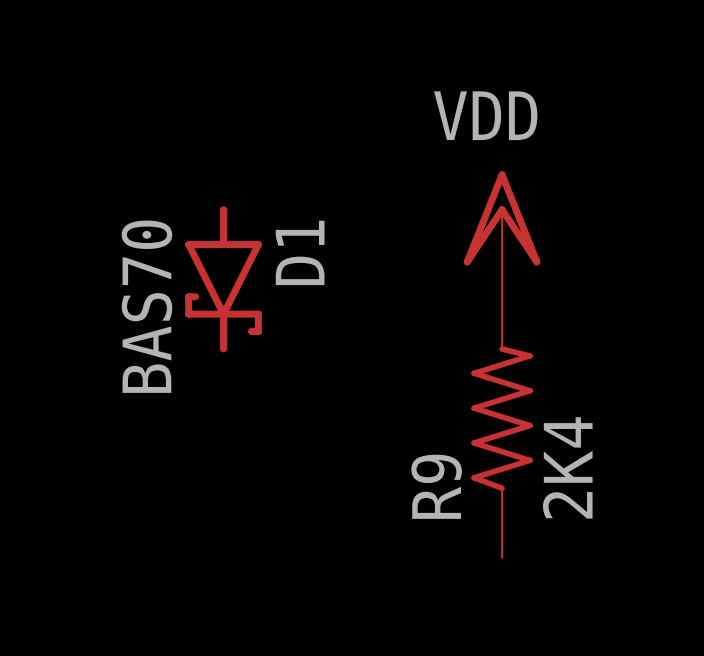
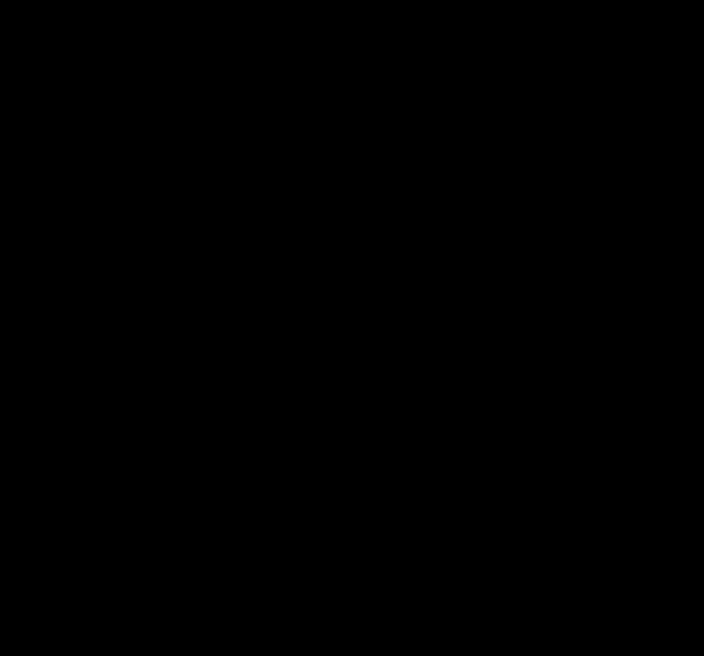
power symbol: VDD (502, 225) -> none
D1: BAS70 (223, 279) -> none
R9: 2K4 (502, 418) -> none

